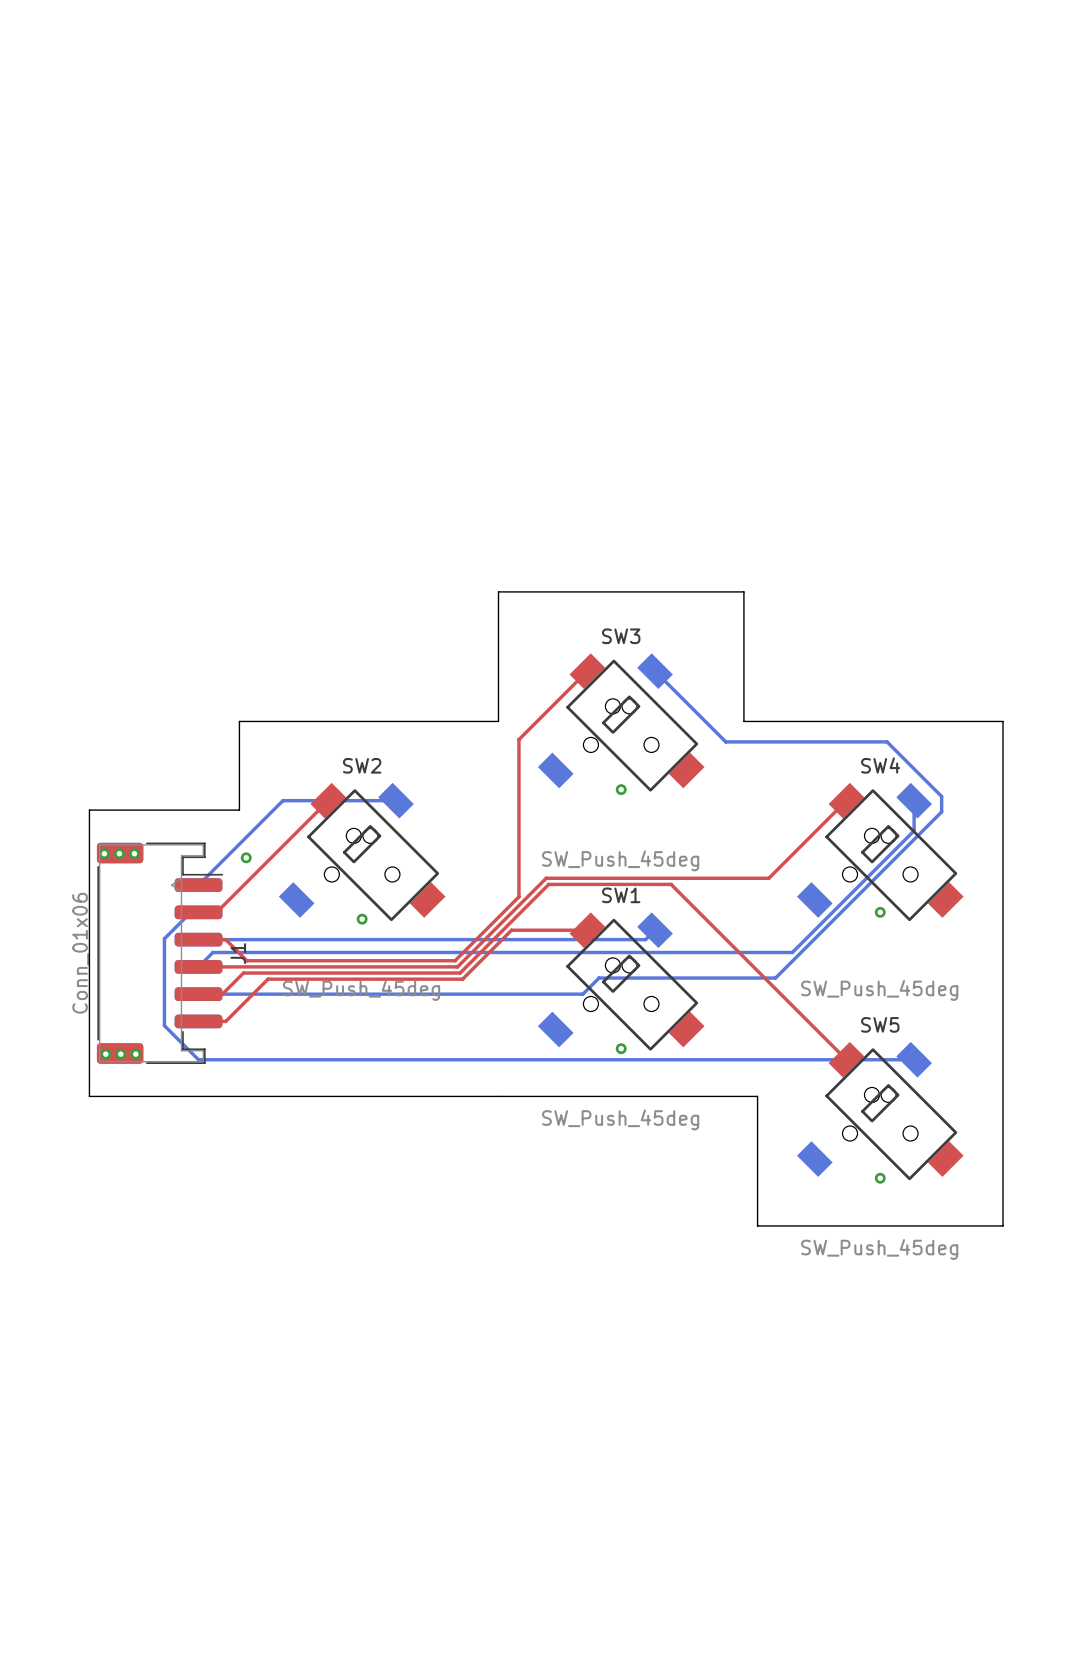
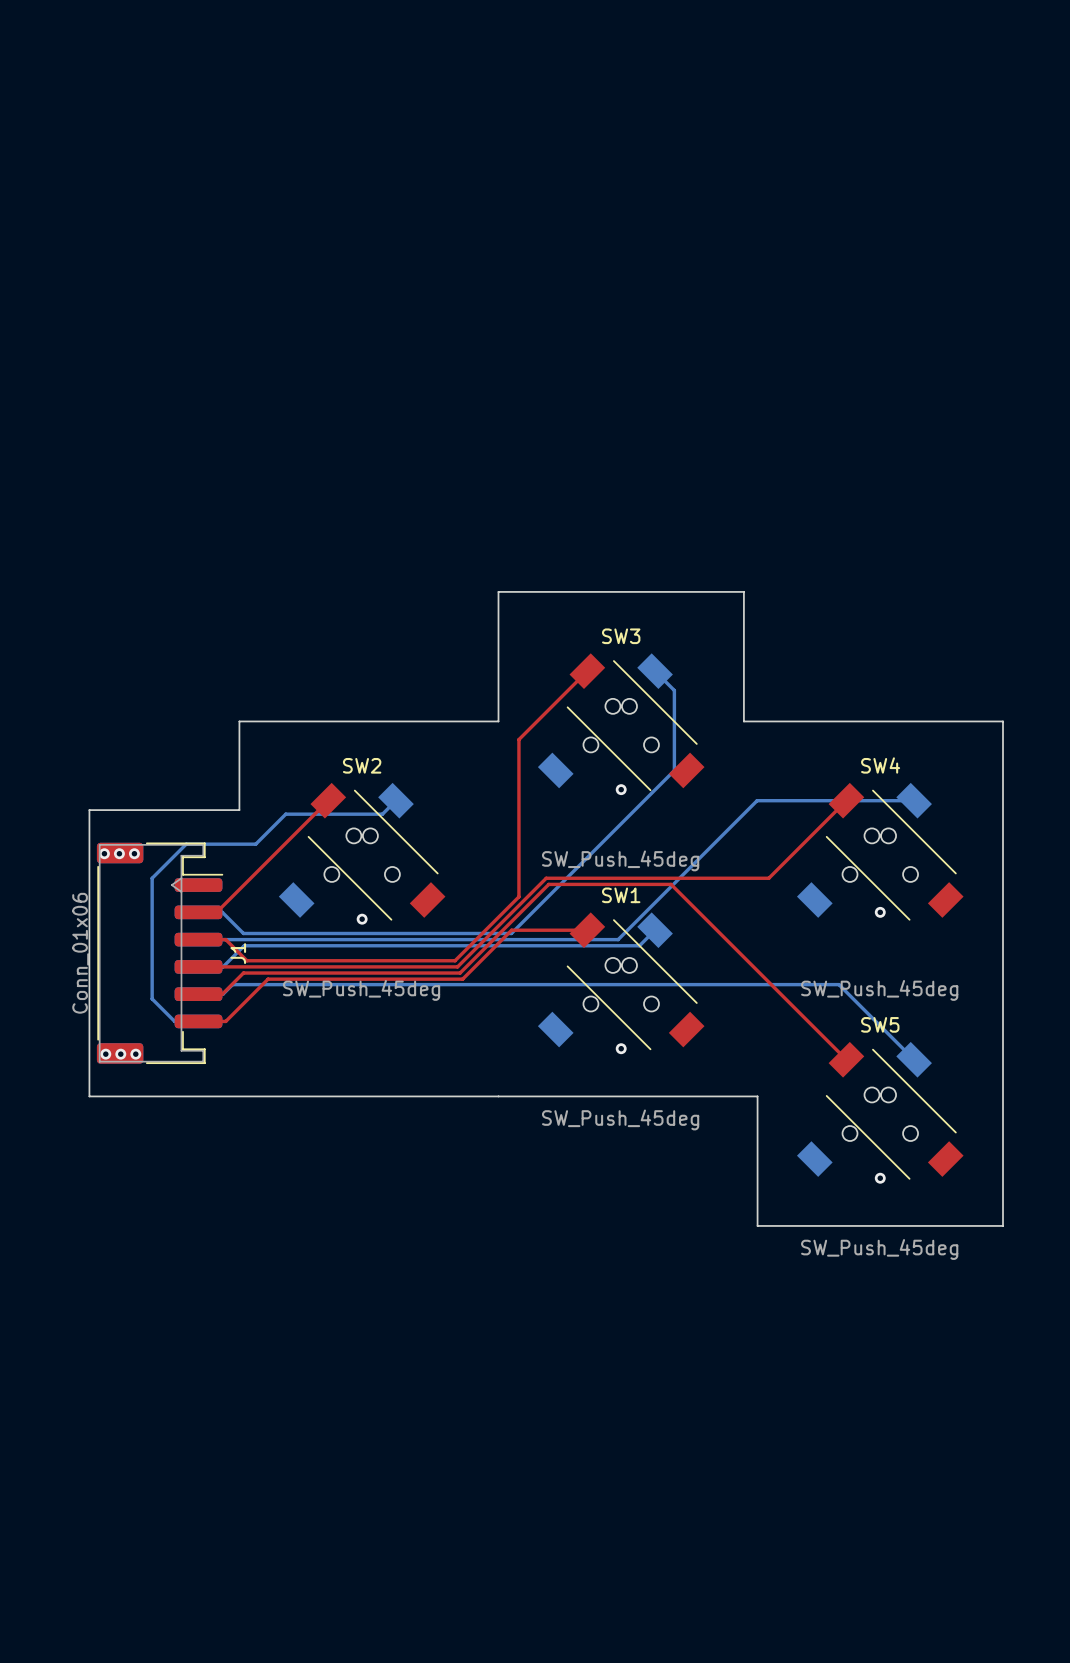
SW3 footprint: [566, 653, 705, 792] -> [566, 653, 705, 792]
bottom track: (674, 690) (725, 741) (887, 741) (941, 796) (941, 811) (775, 978) (599, 978) (582, 994) (223, 994) -> (674, 690) (674, 770) (511, 933) (243, 933) (222, 912) (198, 912)
SW2 footprint: [307, 782, 446, 922] -> [307, 782, 446, 921]
SW4 footprint: [825, 782, 964, 922] -> [825, 782, 964, 921]
bottom track: (395, 800) (282, 800) (198, 885) -> (395, 800) (382, 814) (285, 814) (255, 844) (186, 844) (152, 878) (152, 998) (174, 1021) (198, 1021)
bottom track: (914, 800) (914, 830) (792, 952) (212, 952) (198, 966) -> (645, 939) (639, 945) (244, 945) (223, 966) (198, 966)
via: (246, 857) -> none
bottom track: (198, 912) (190, 912) (164, 938) (164, 1025) (198, 1059) (914, 1059) -> (223, 994) (232, 984) (838, 984) (914, 1059)
SW1 footprint: [566, 912, 705, 1051] -> [566, 912, 705, 1051]
bottom track: (618, 939) (645, 939) -> (618, 939) (757, 800) (914, 800)
SW5 footprint: [825, 1041, 964, 1181] -> [825, 1041, 964, 1180]

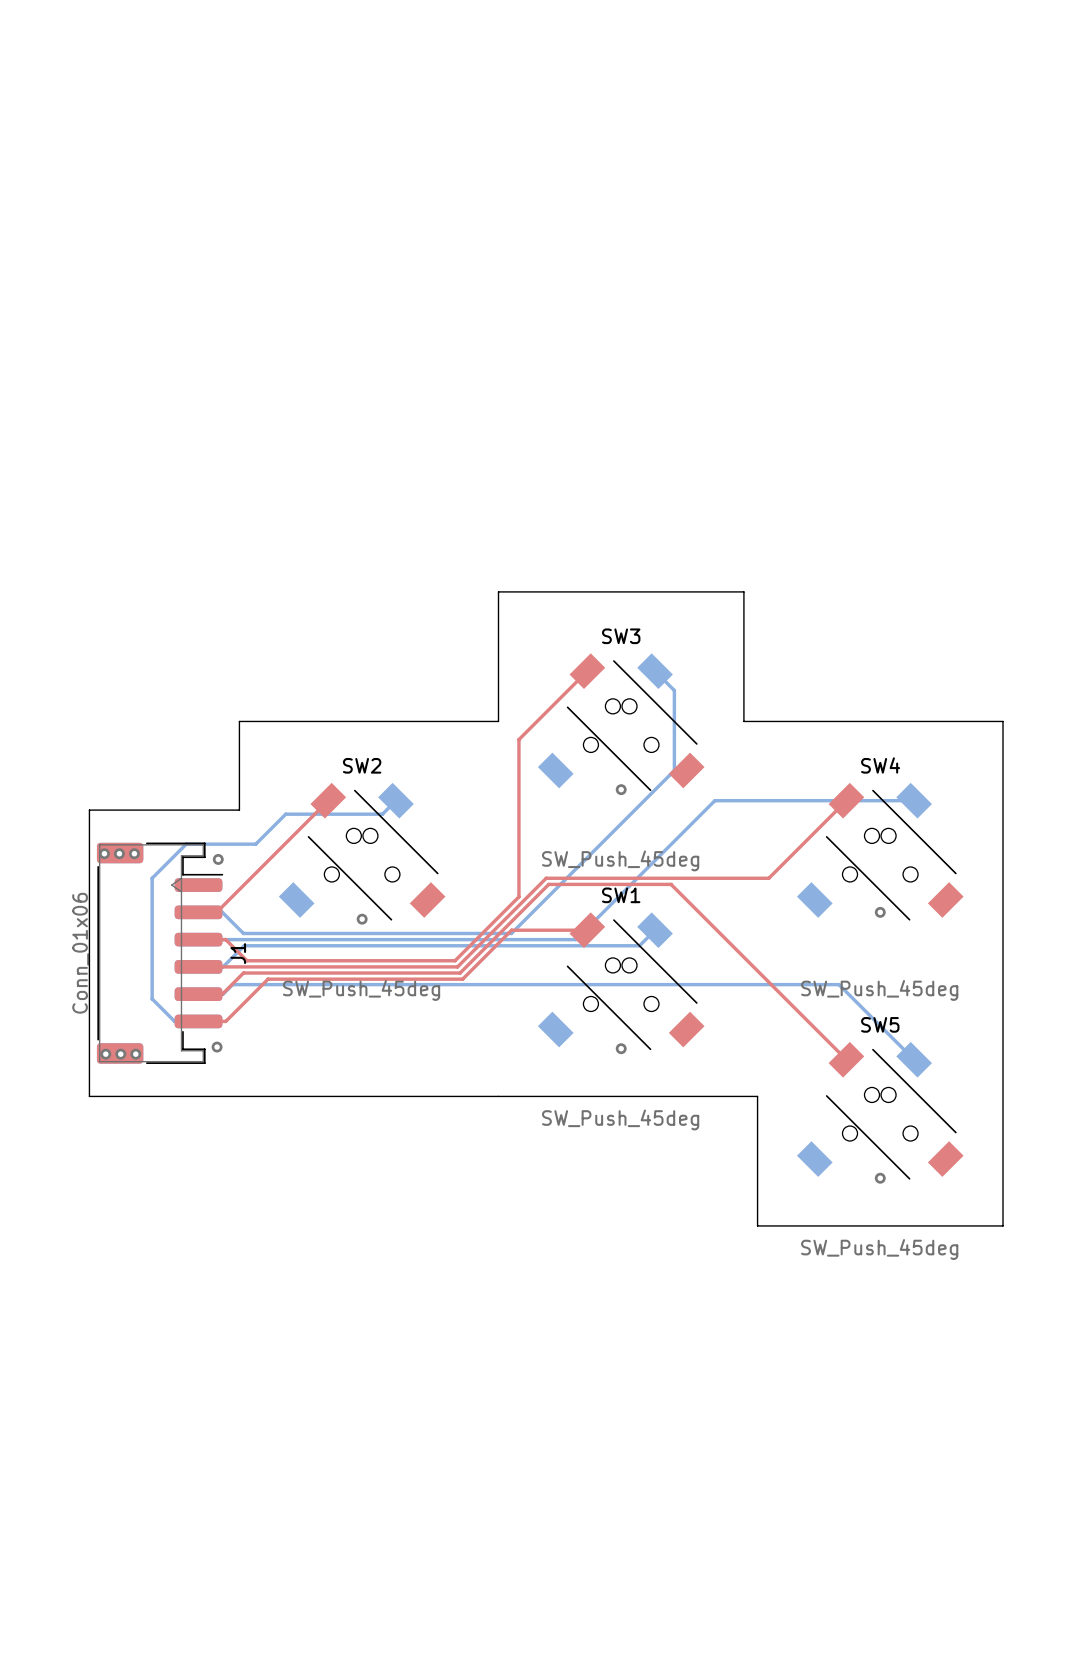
bottom track: (757, 800) (618, 939) (575, 939) -> (757, 800) (714, 800) (575, 939)
via: none -> (218, 859)
via: none -> (217, 1047)

